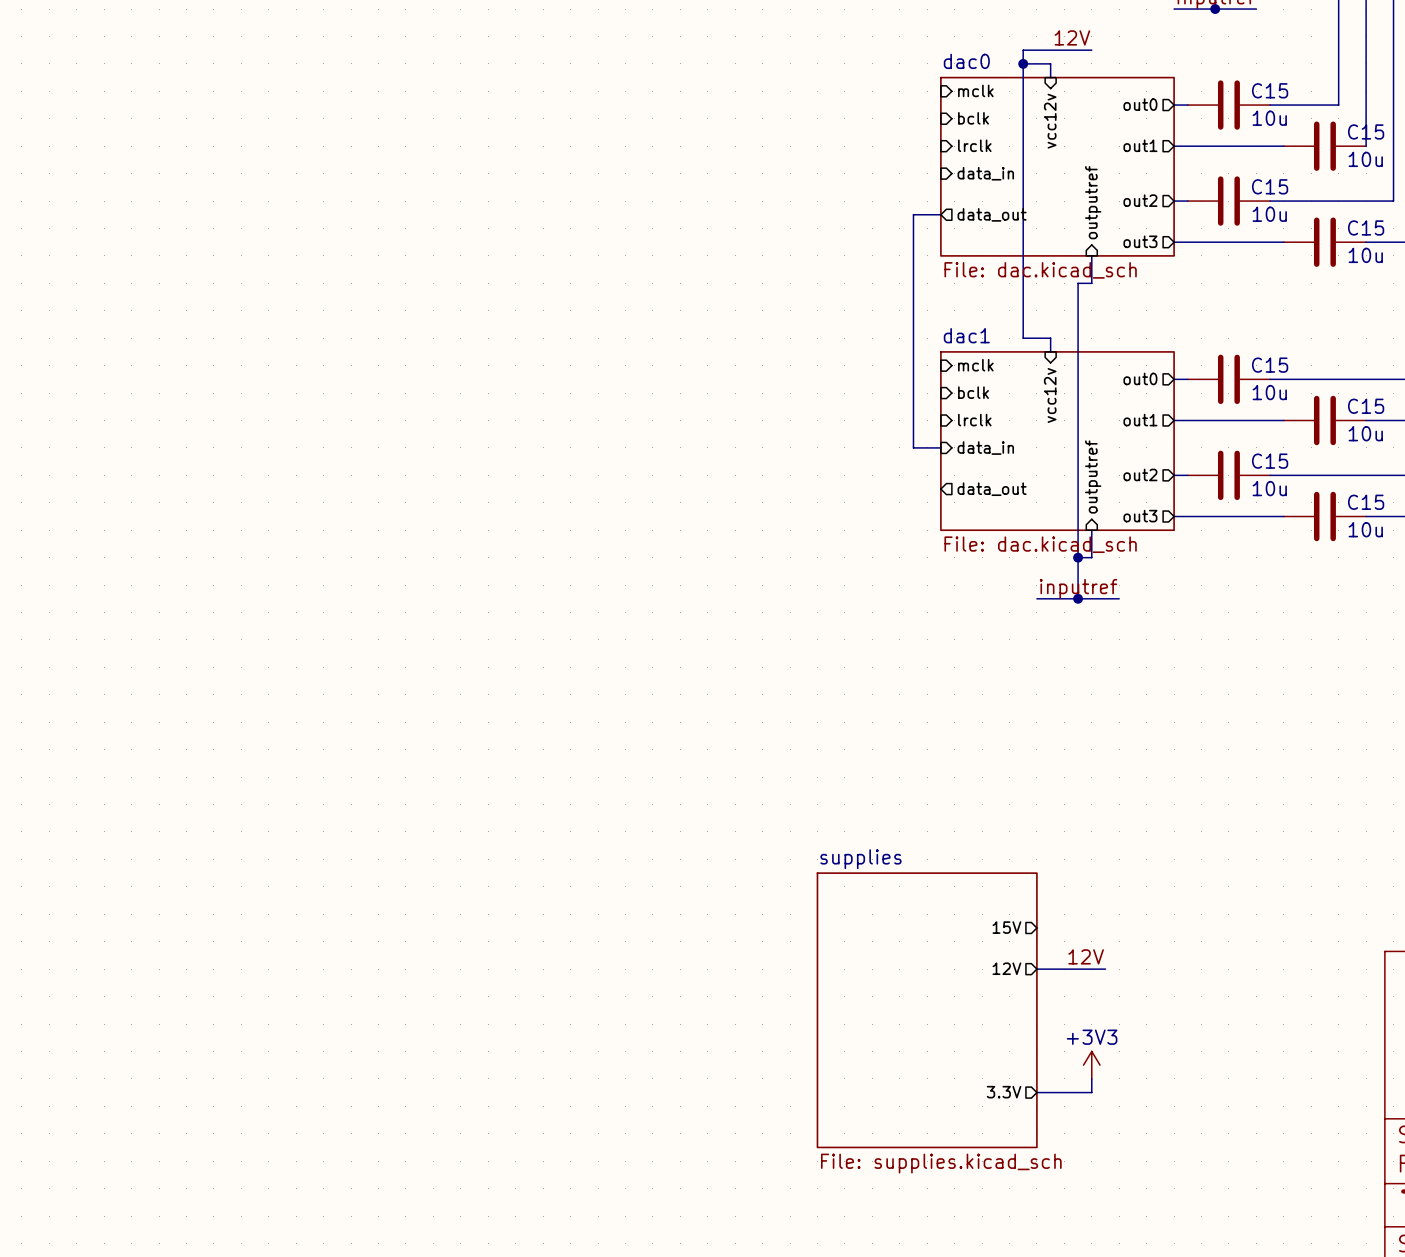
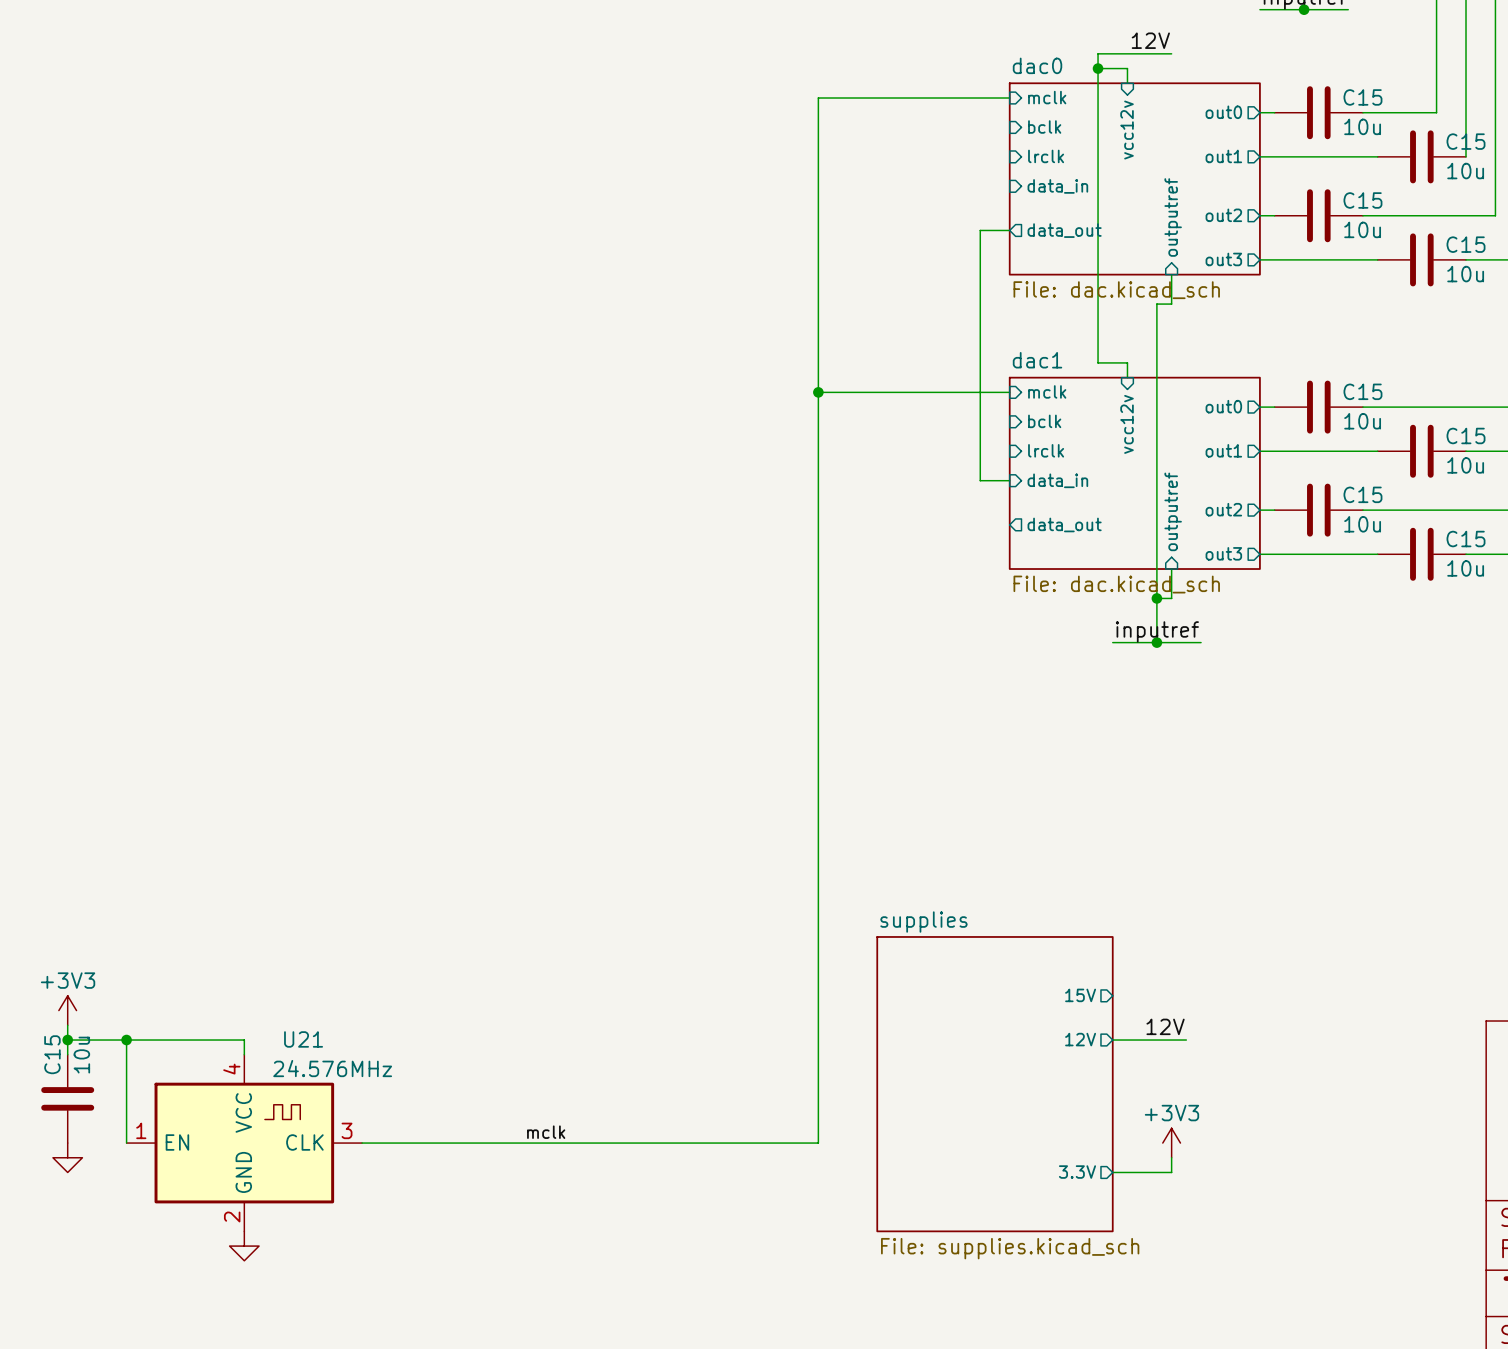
wire: none -> (1009, 98) (818, 98) (818, 1143) (362, 1143)
wire: none -> (818, 392) (1009, 392)
junction: none -> (818, 392)
power symbol: none -> +3V3 (67, 1010)
wire: none -> (67, 1025) (67, 1054)
wire: none -> (67, 1040) (244, 1040) (244, 1054)
junction: none -> (67, 1040)
wire: none -> (126, 1040) (126, 1143)
junction: none -> (126, 1040)
C15: none -> 10u (67, 1098)
label: none -> mclk (546, 1132)
U21: none -> 24.576MHz (244, 1143)
power symbol: none -> (67, 1157)
power symbol: none -> (244, 1246)

